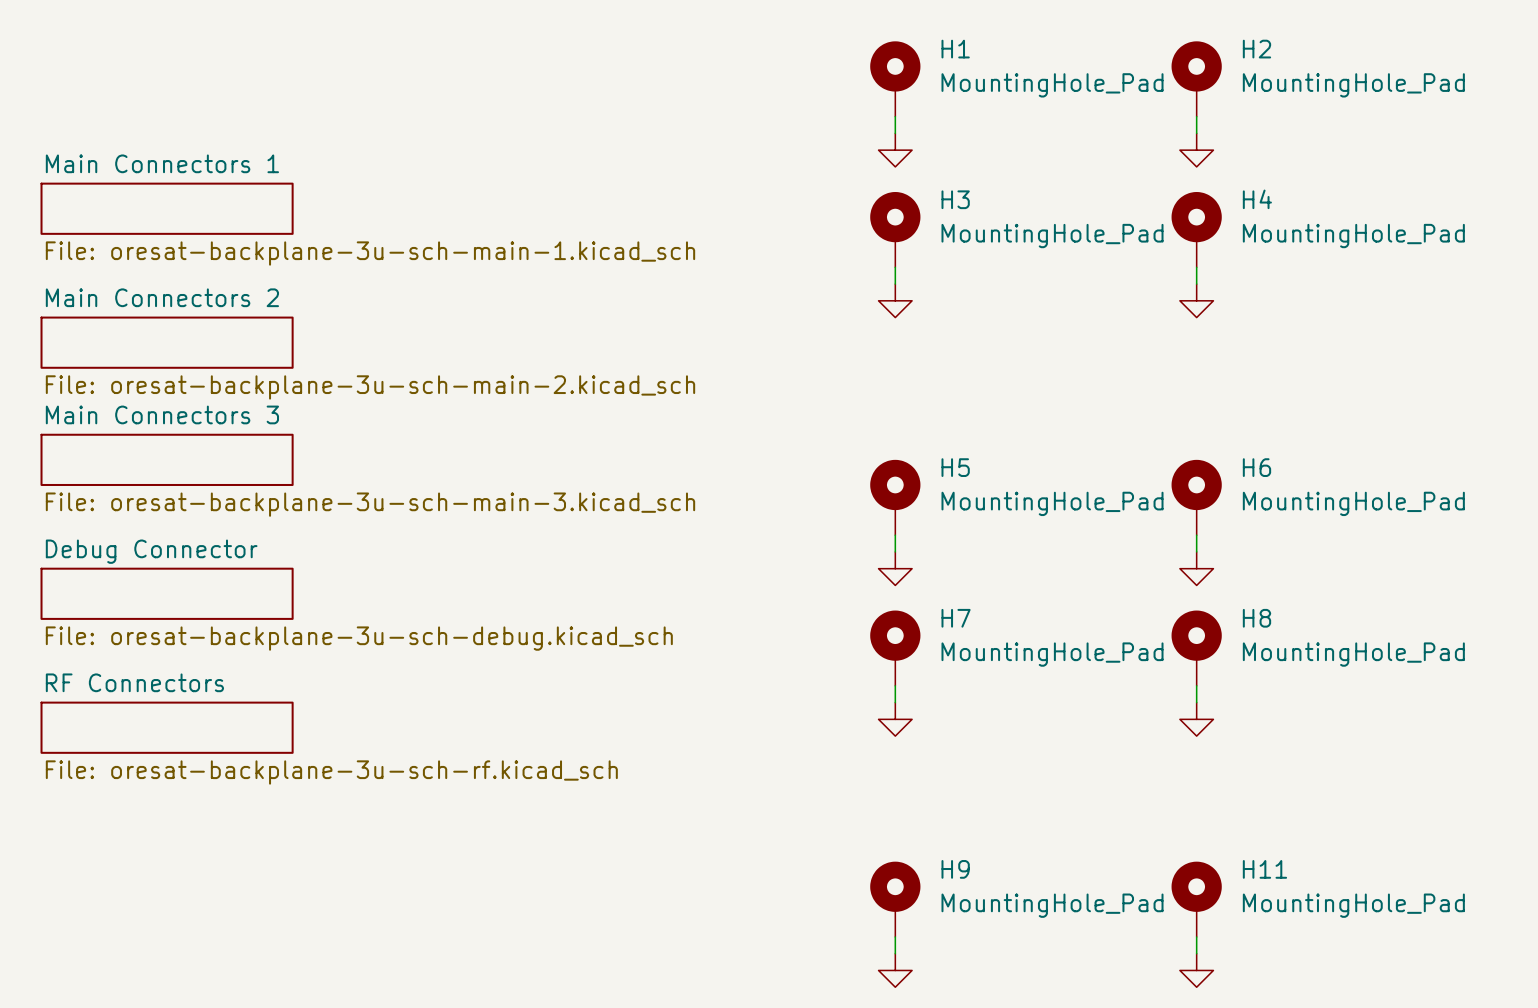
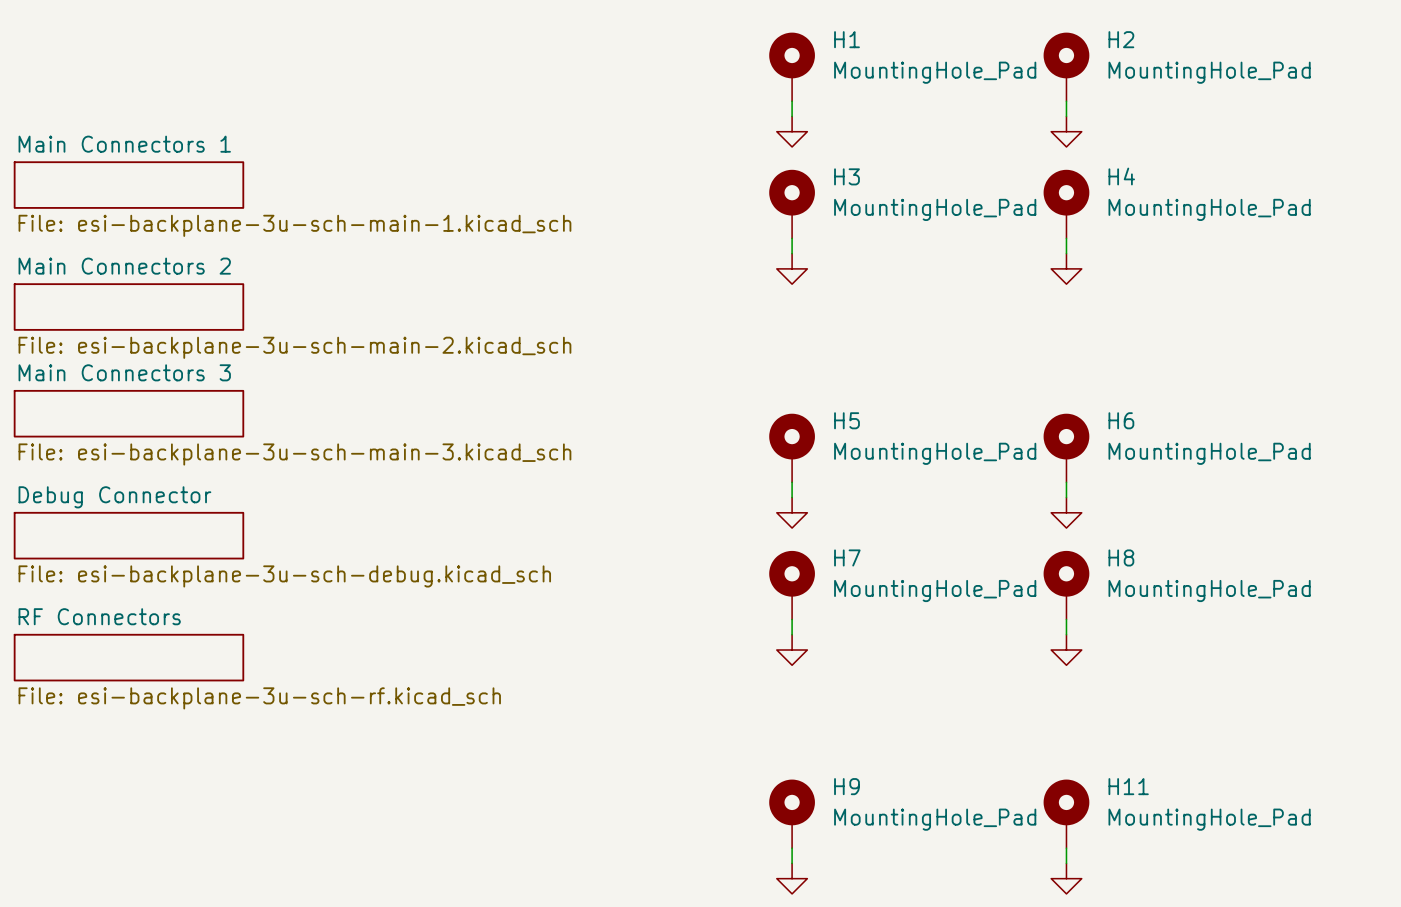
sheet Main Connectors 1 value: File: oresat-backplane-3u-sch-main-1.kicad_sch (370, 253) -> File: esi-backplane-3u-sch-main-1.kicad_sch (294, 225)
sheet Main Connectors 2 value: File: oresat-backplane-3u-sch-main-2.kicad_sch (370, 387) -> File: esi-backplane-3u-sch-main-2.kicad_sch (294, 347)
sheet Main Connectors 3 value: File: oresat-backplane-3u-sch-main-3.kicad_sch (370, 504) -> File: esi-backplane-3u-sch-main-3.kicad_sch (294, 454)
sheet Debug Connector value: File: oresat-backplane-3u-sch-debug.kicad_sch (359, 638) -> File: esi-backplane-3u-sch-debug.kicad_sch (284, 576)
sheet RF Connectors value: File: oresat-backplane-3u-sch-rf.kicad_sch (331, 772) -> File: esi-backplane-3u-sch-rf.kicad_sch (259, 698)

